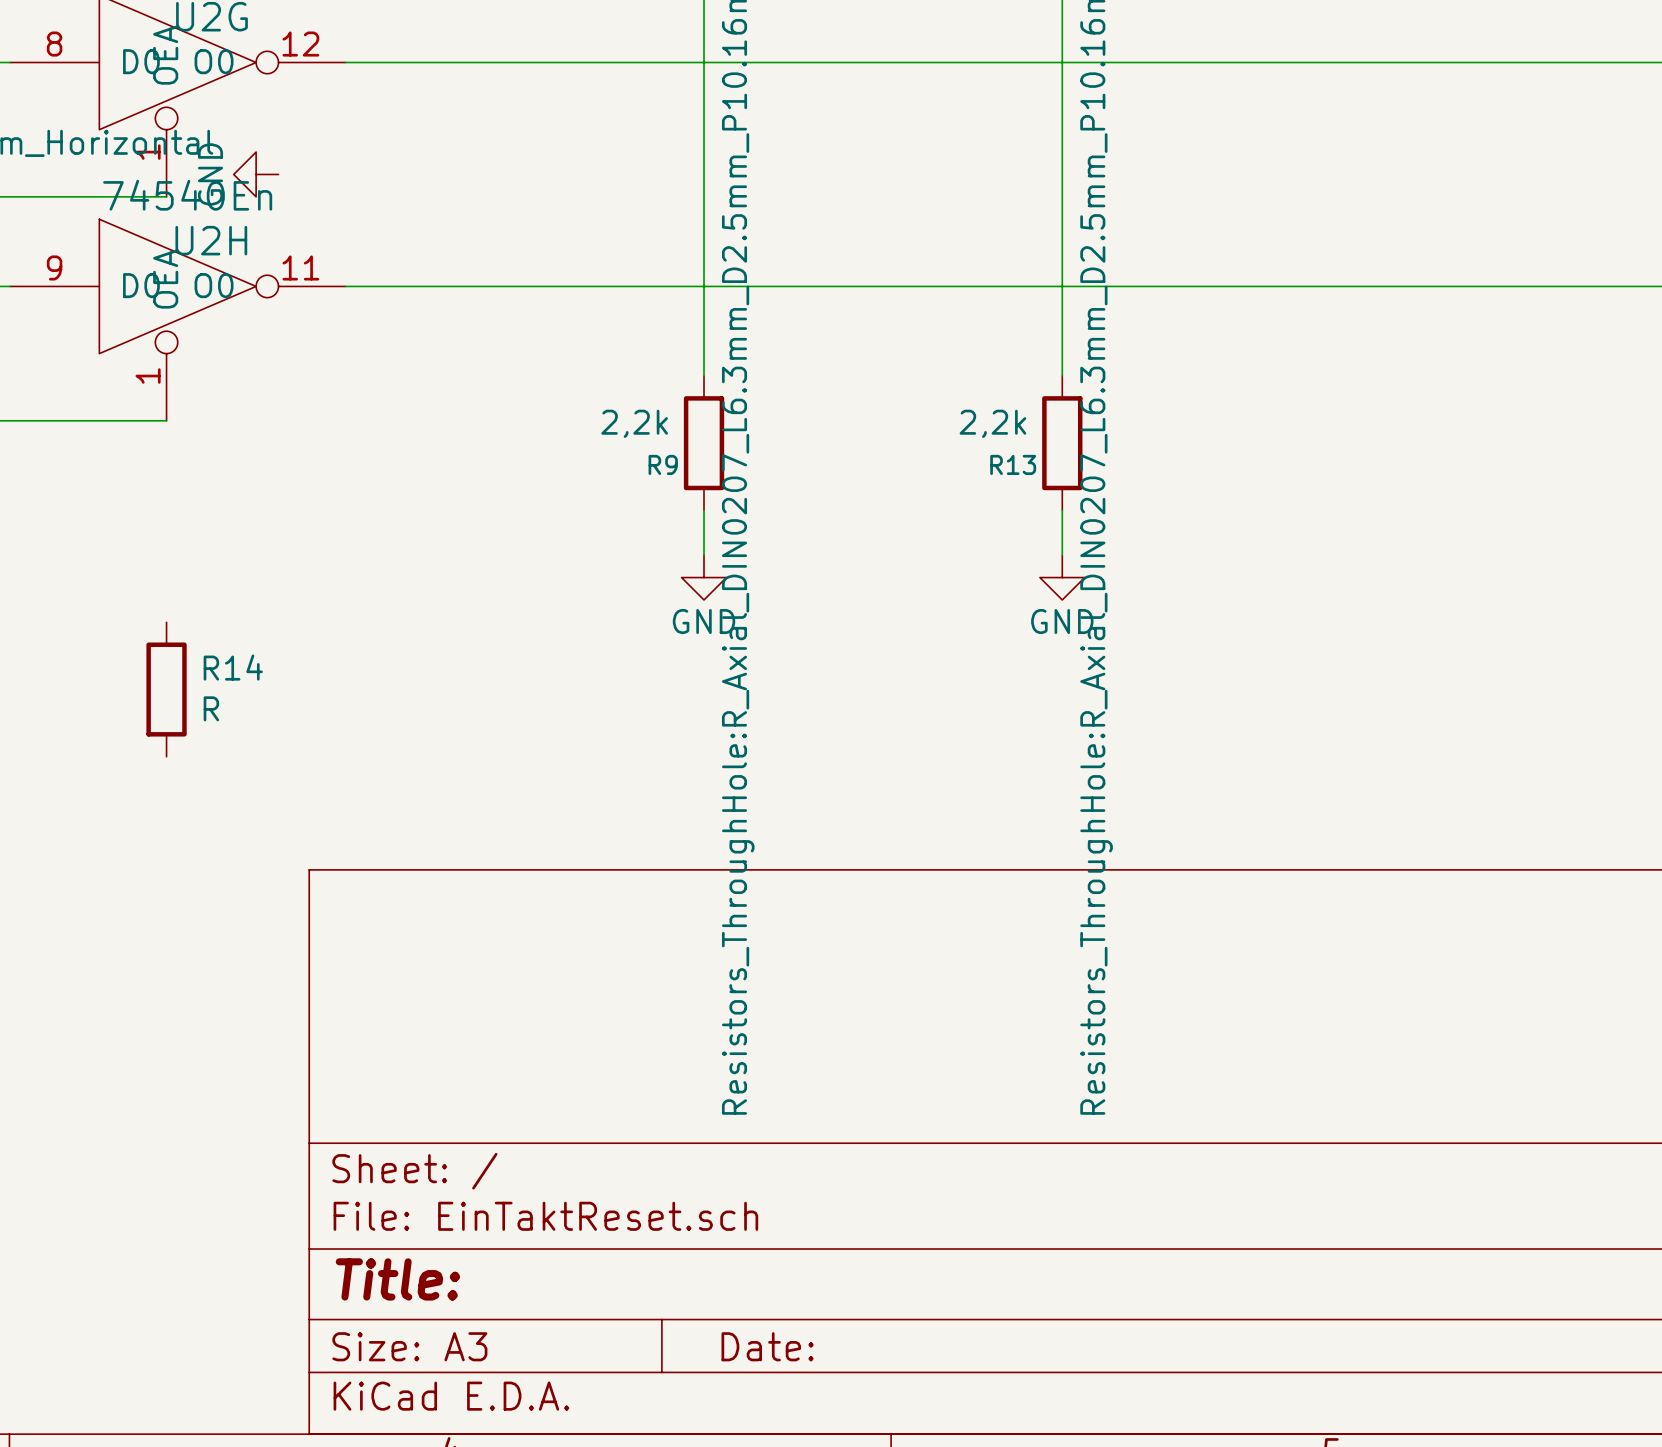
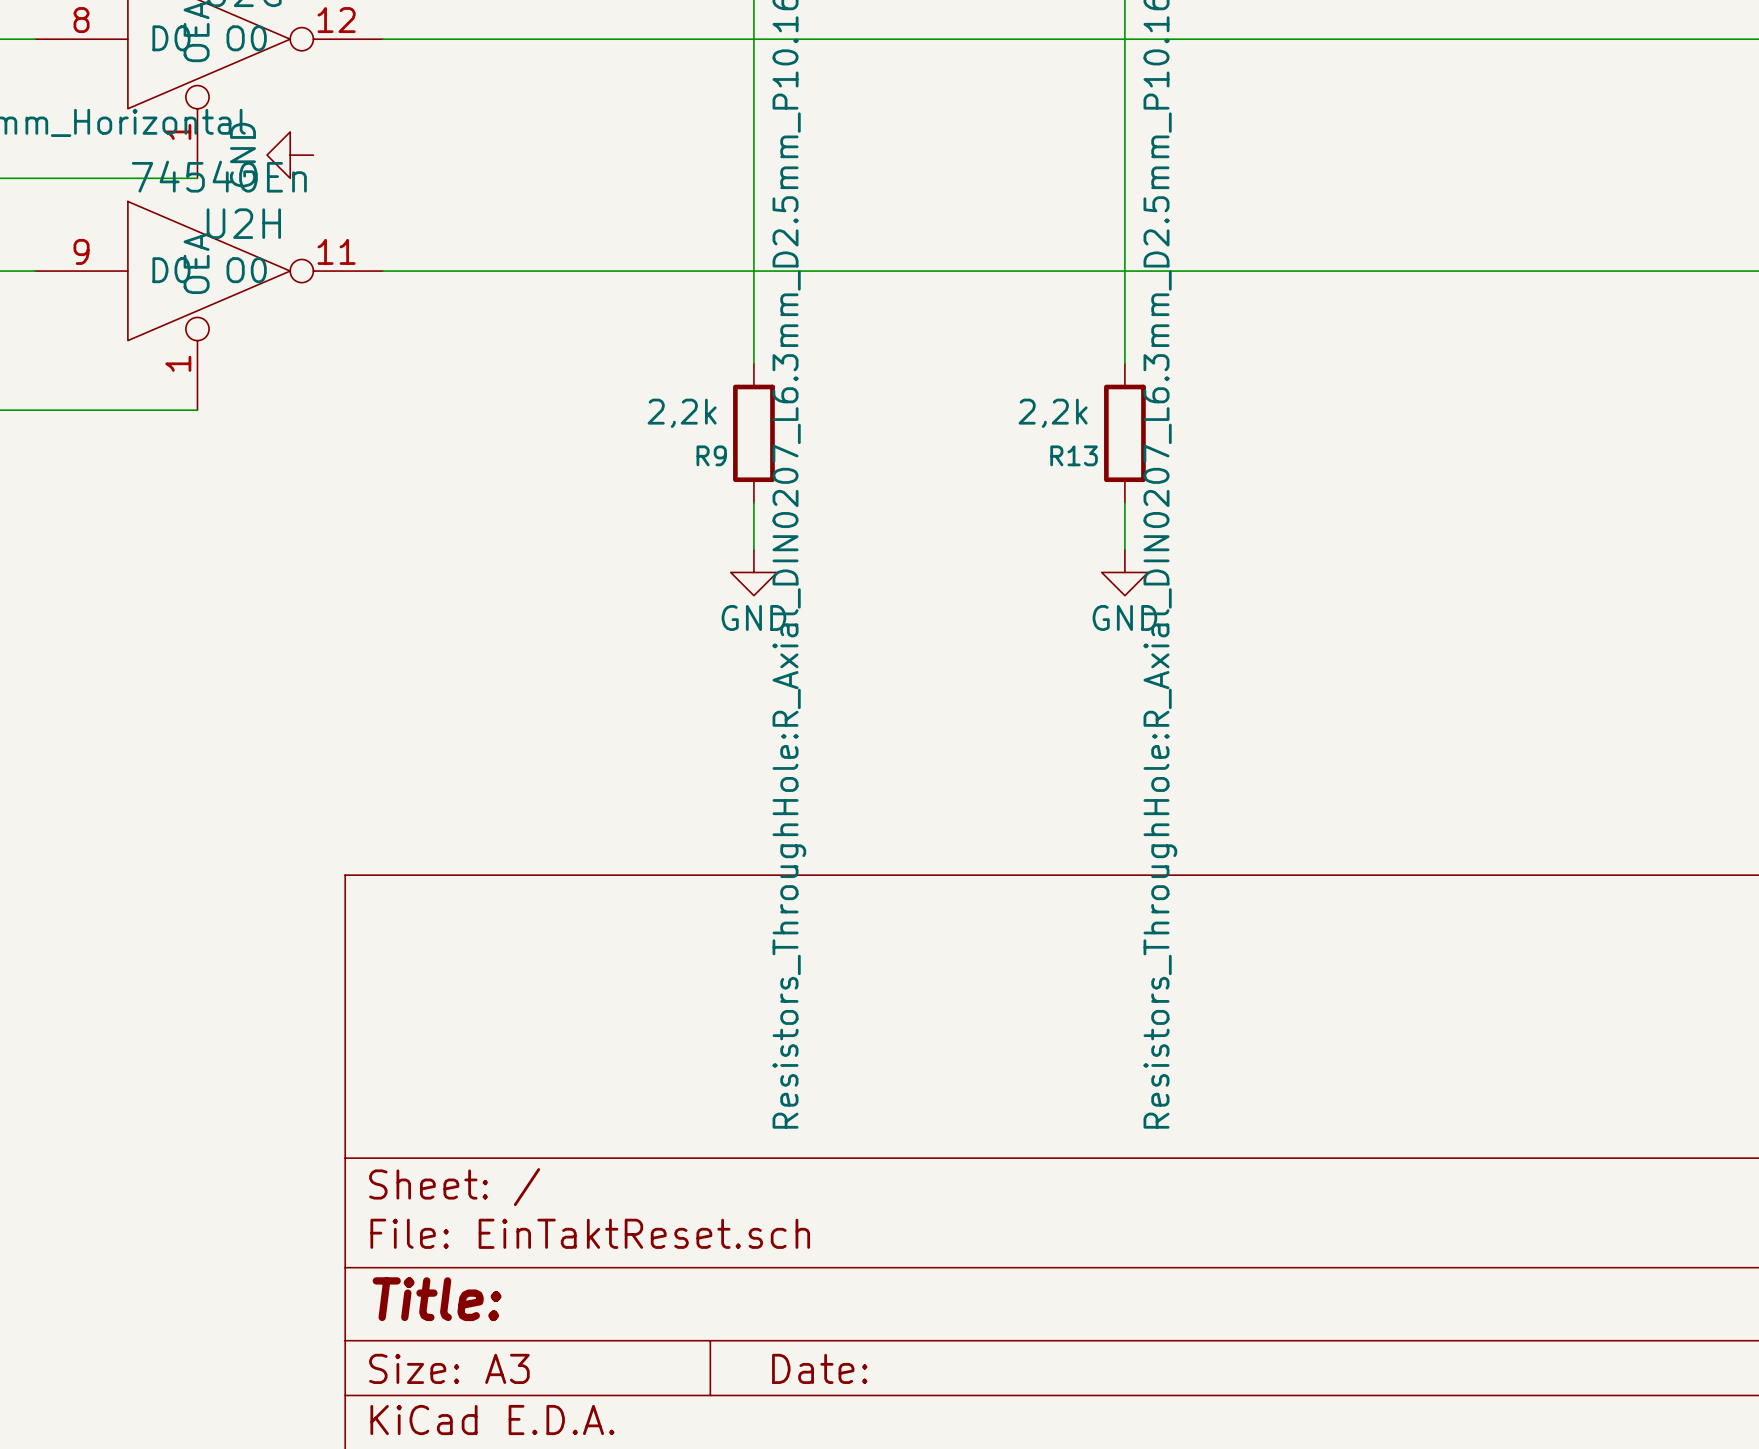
R14: R (166, 689) -> none

